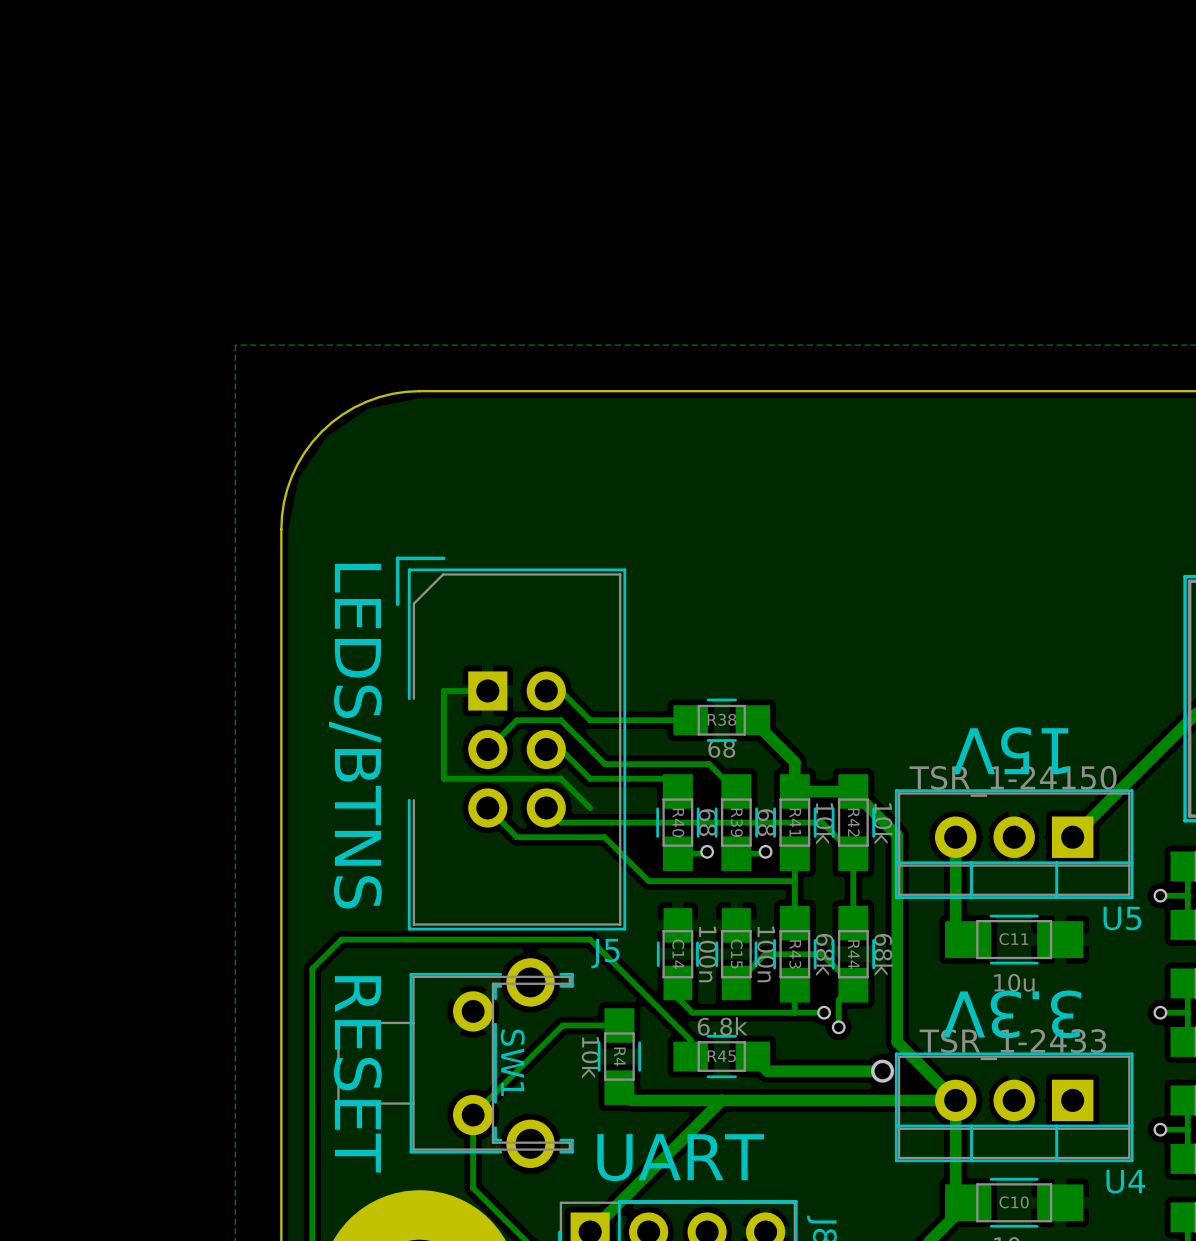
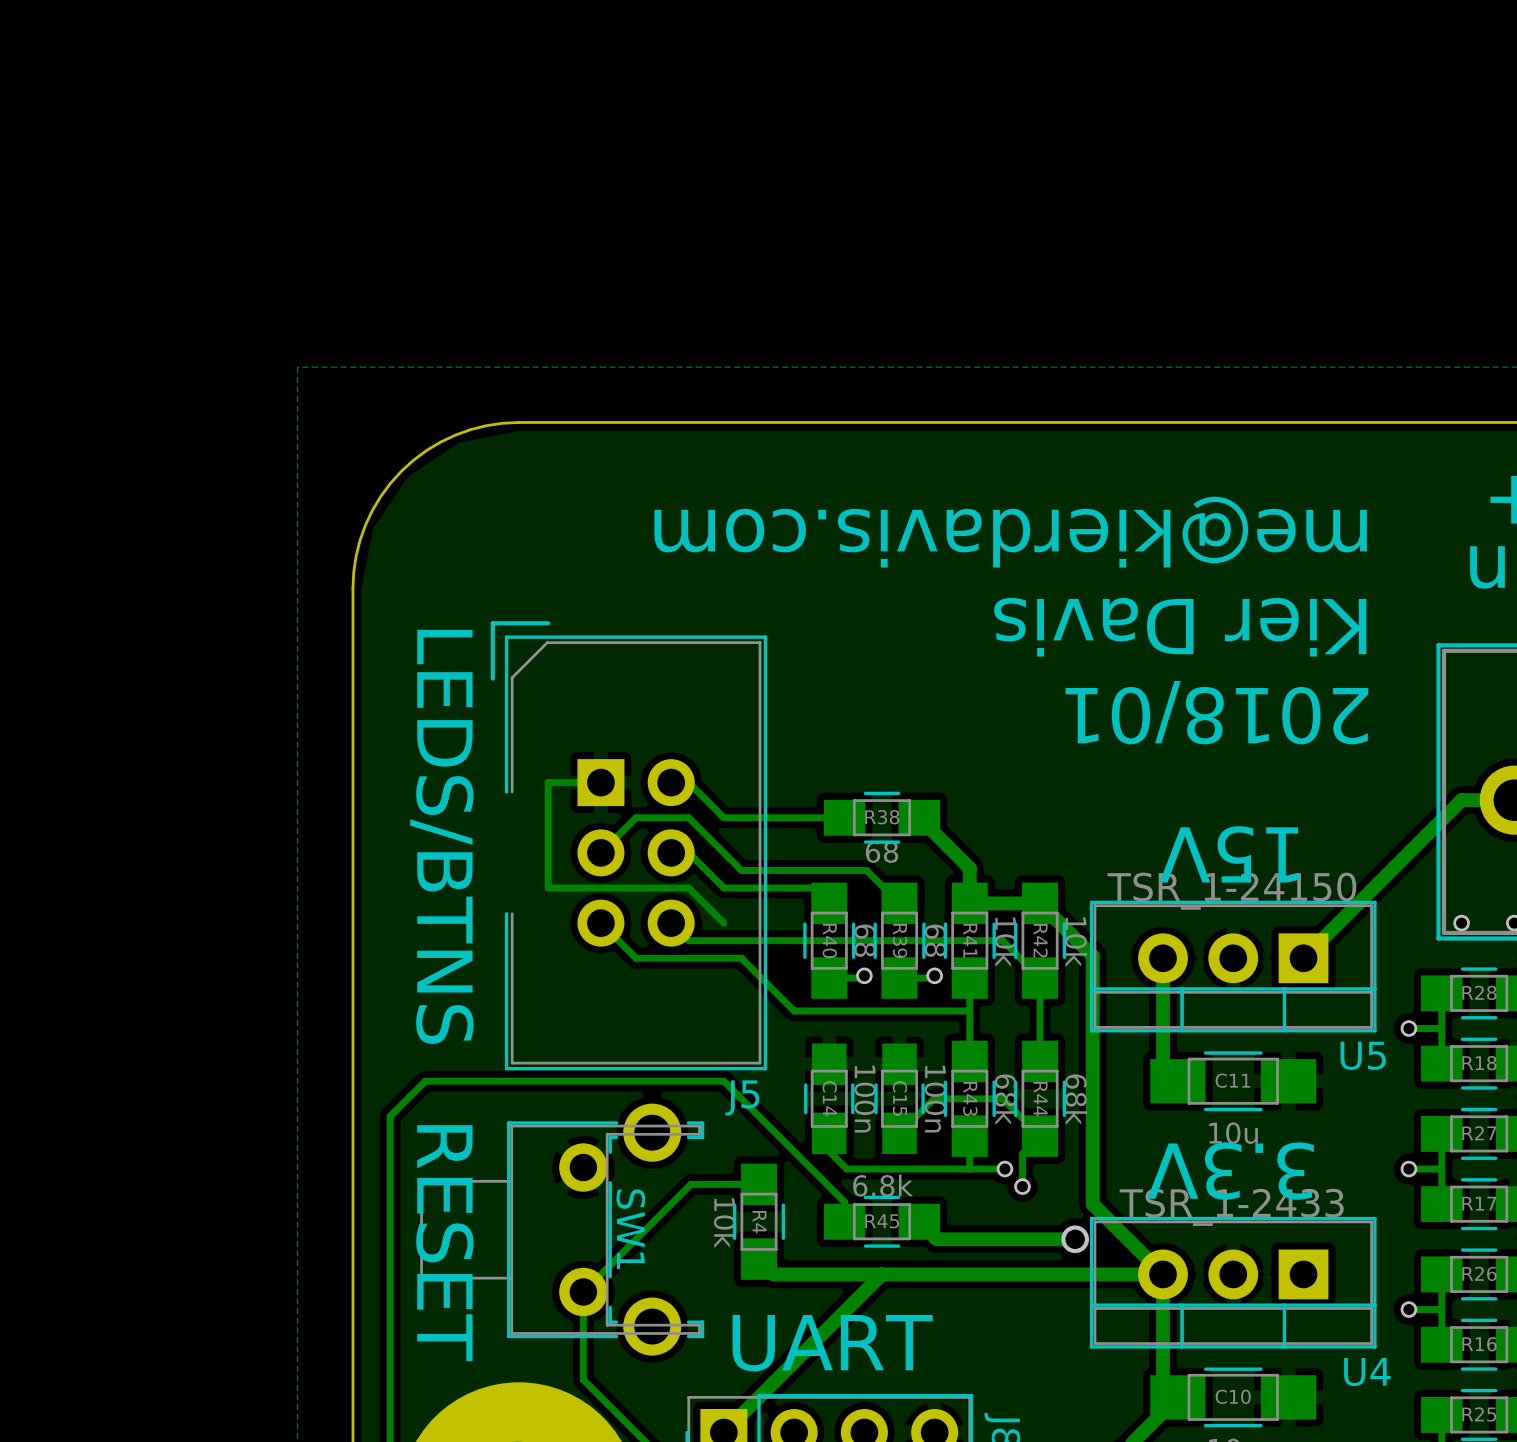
text: none -> me@kierdavis.com (1010, 532)
text: none -> Kier Davis (1180, 627)
text: none -> 2018/01 (1216, 712)

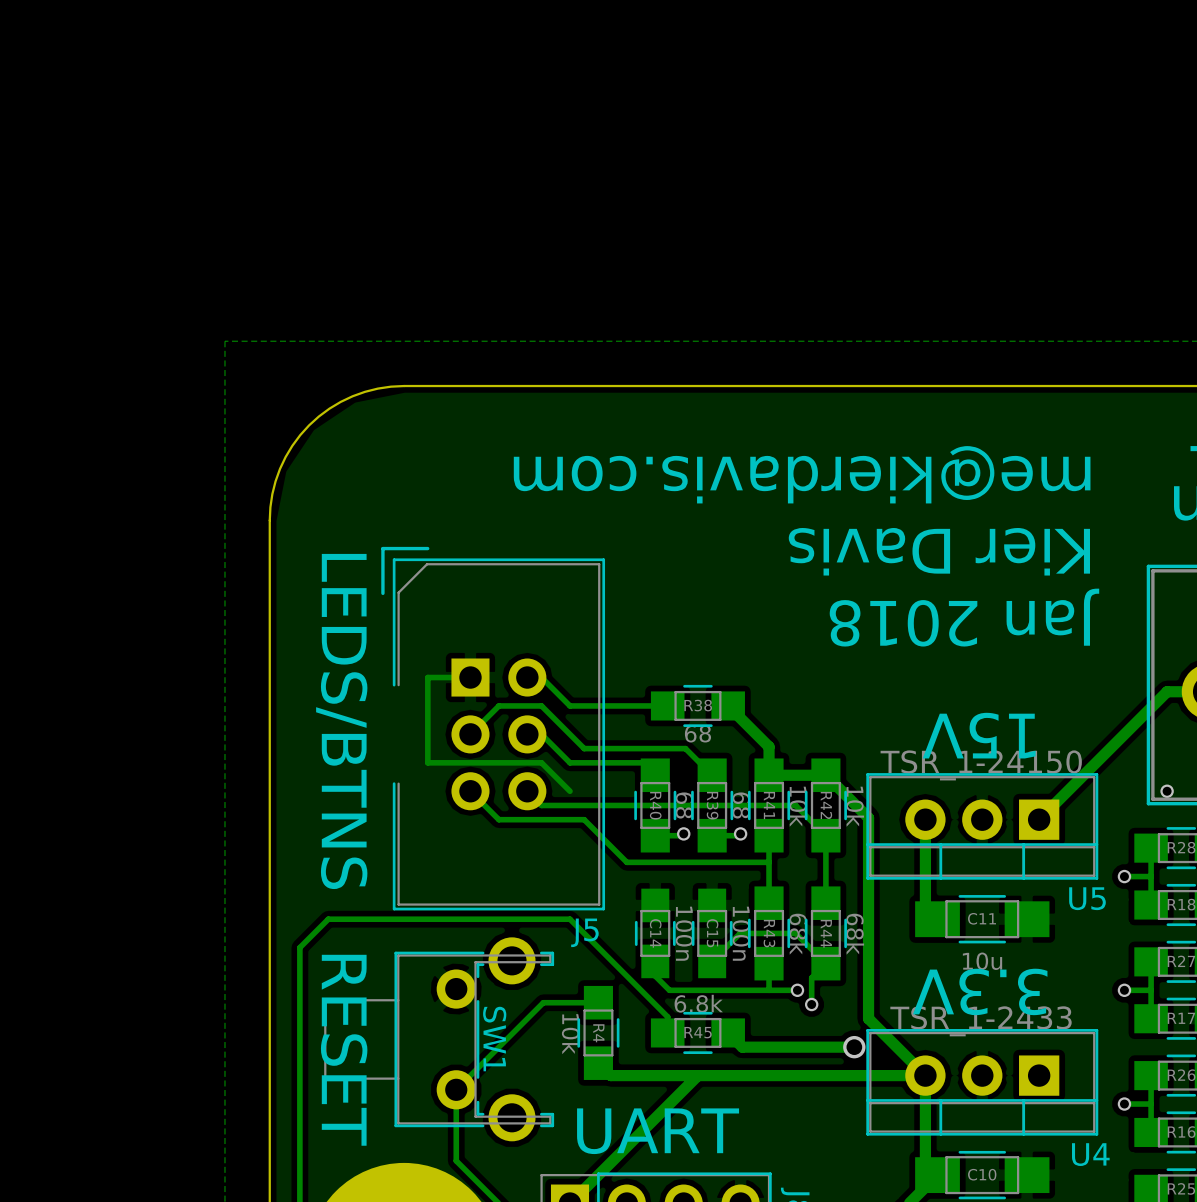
text: 2018/01 (1216, 712) -> Jan 2018 (964, 617)

